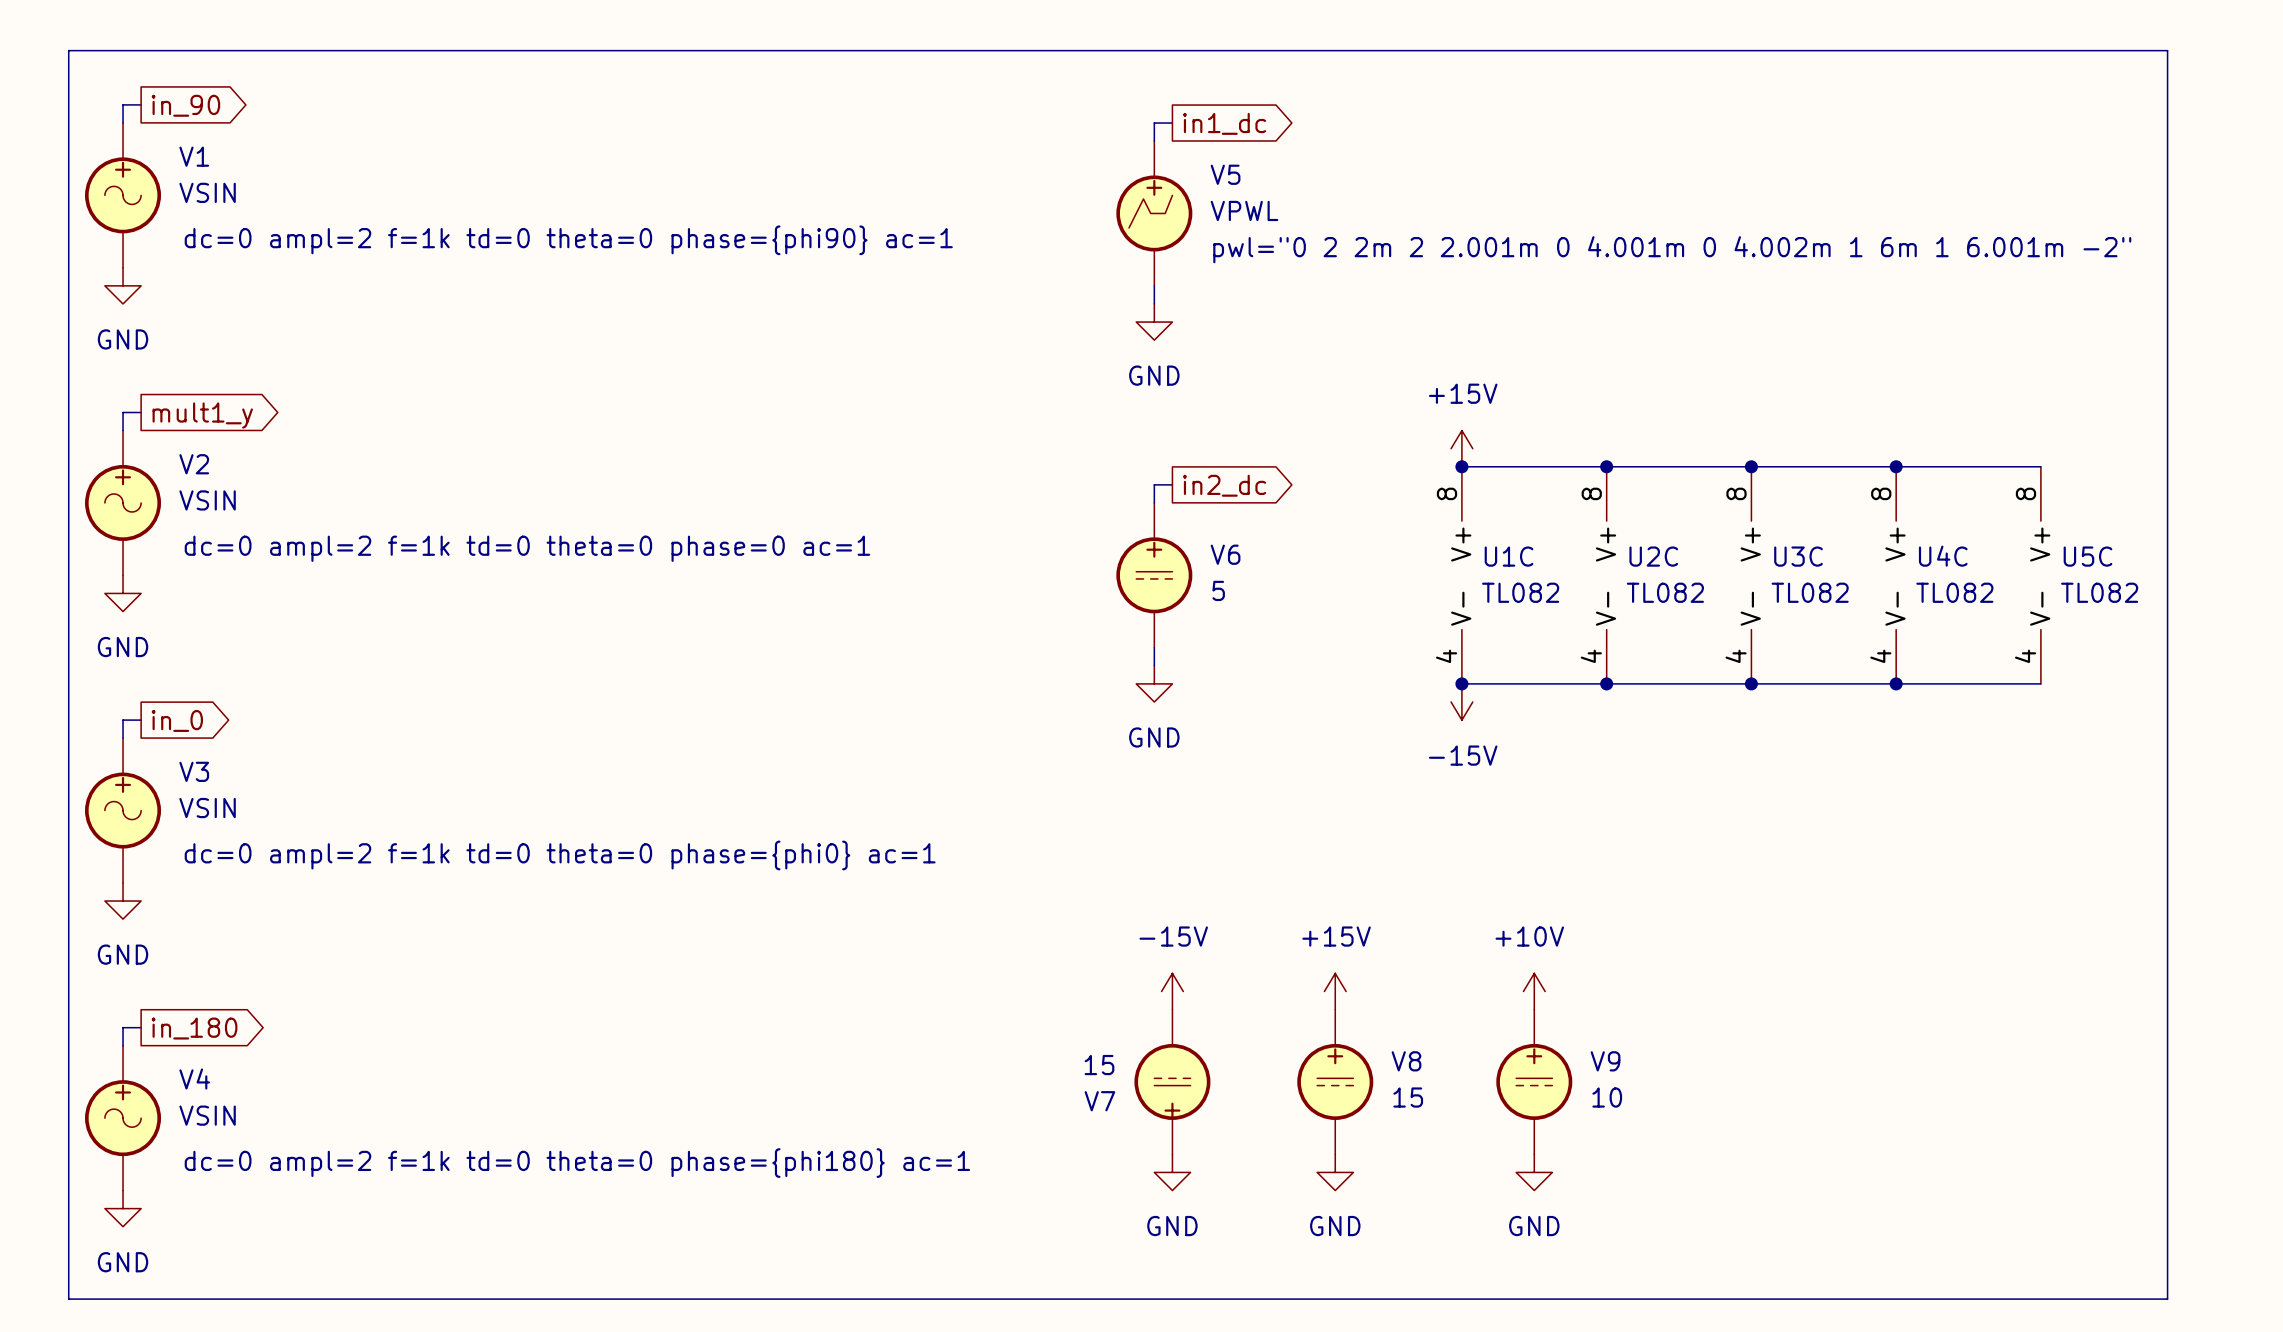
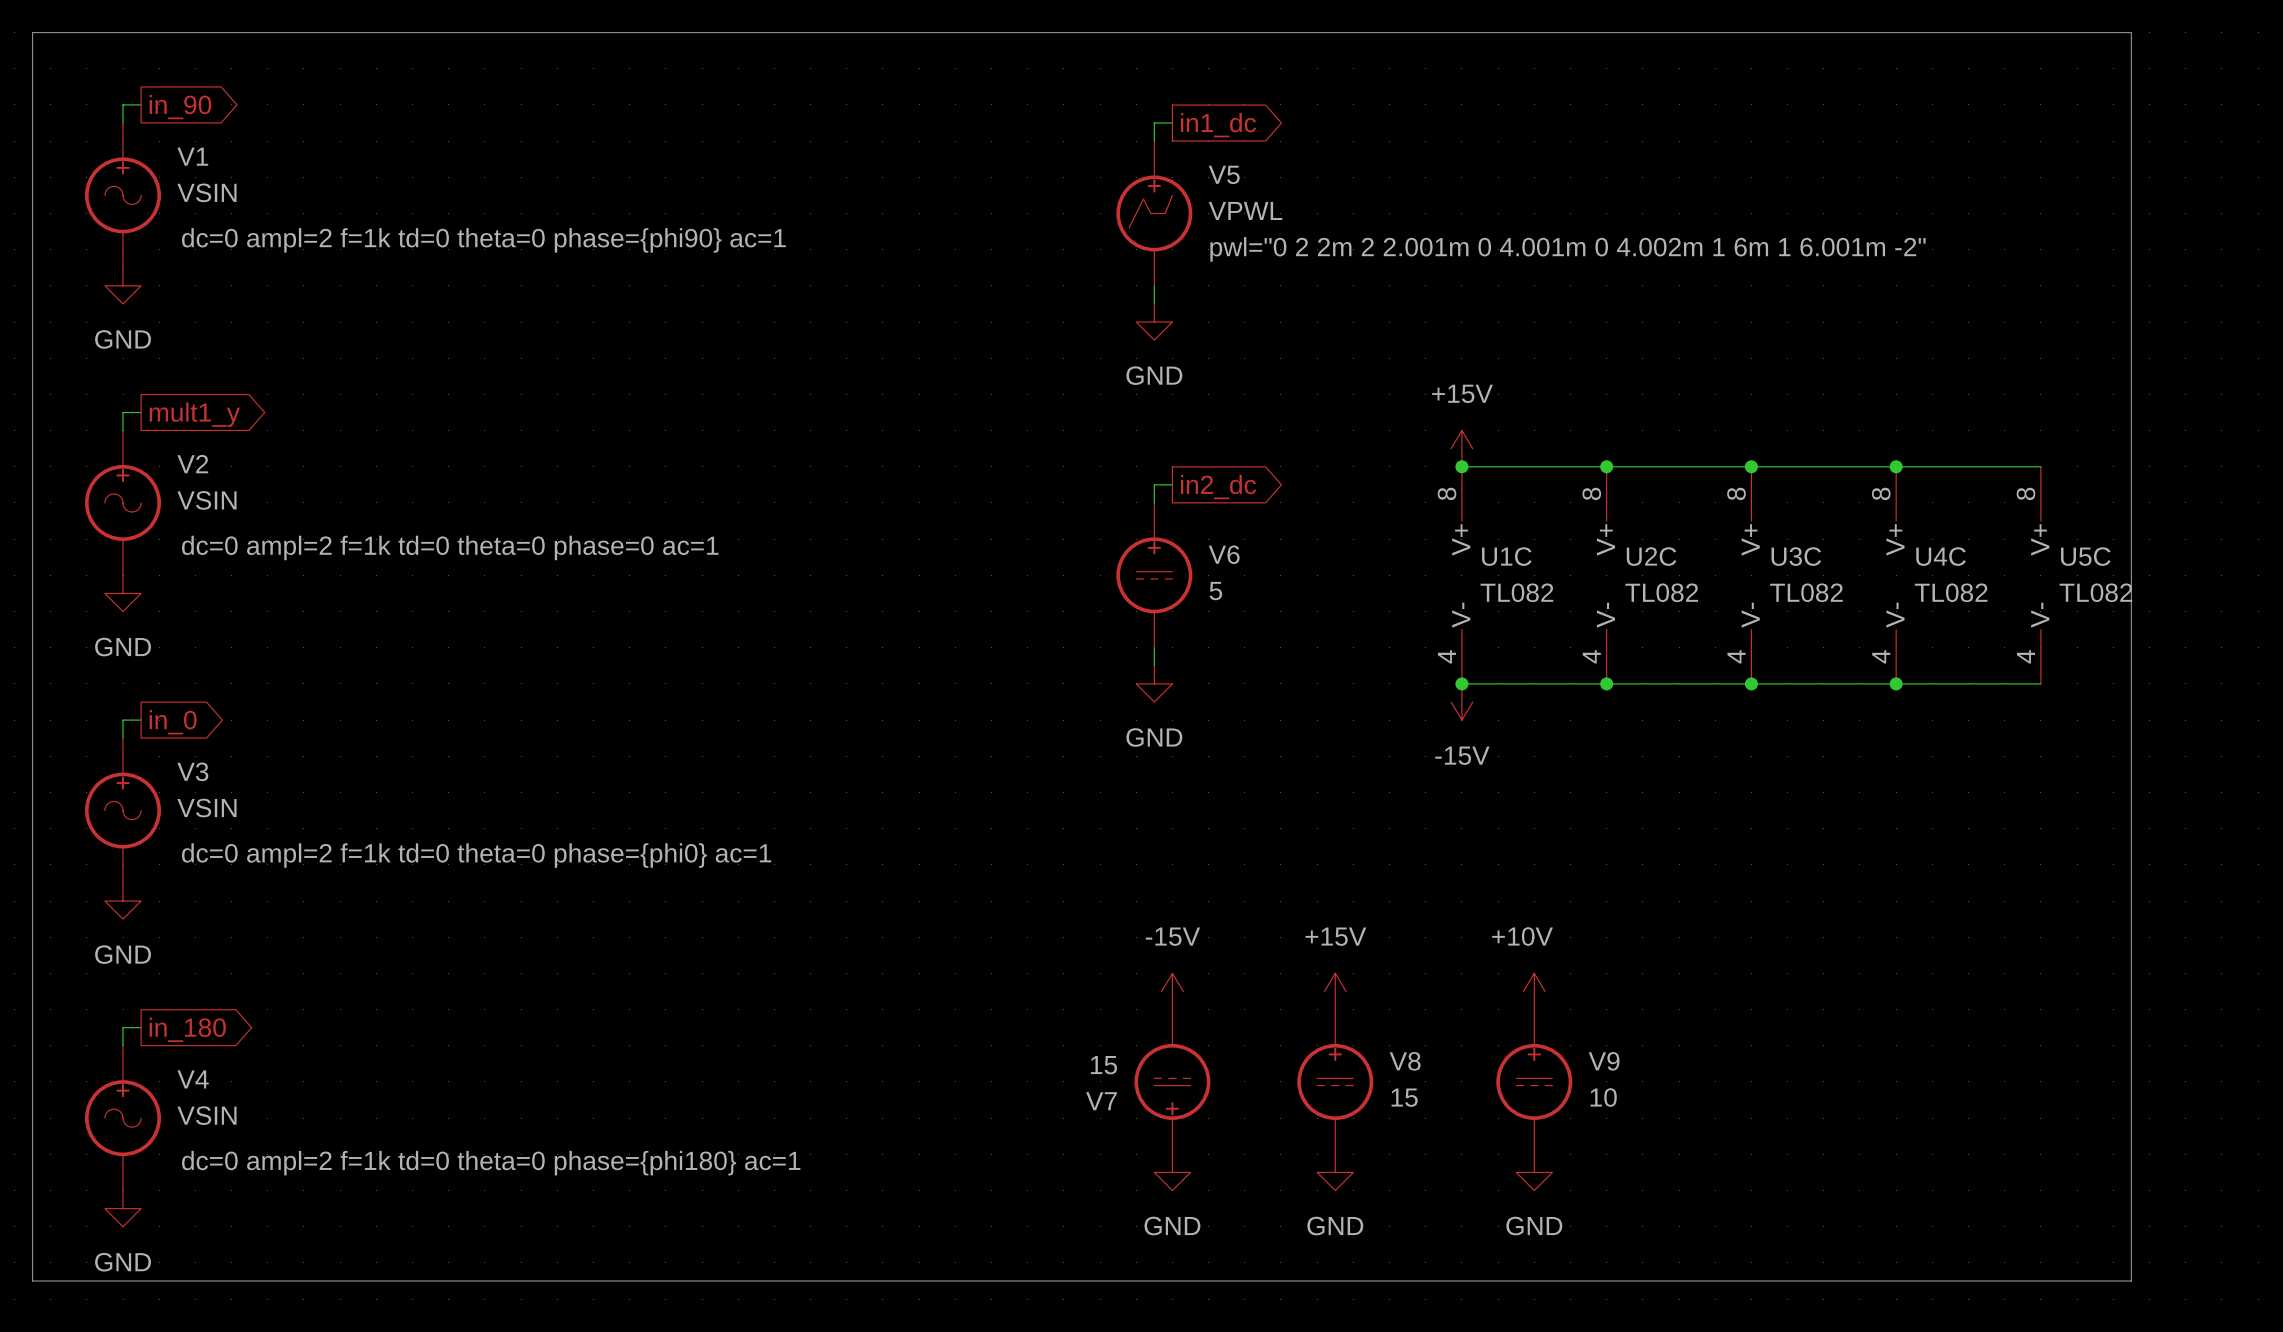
line: (68, 50) (2167, 50) (2167, 1299) (68, 1299) (68, 50) -> (32, 32) (2131, 32) (2131, 1280) (32, 1280) (32, 32)

